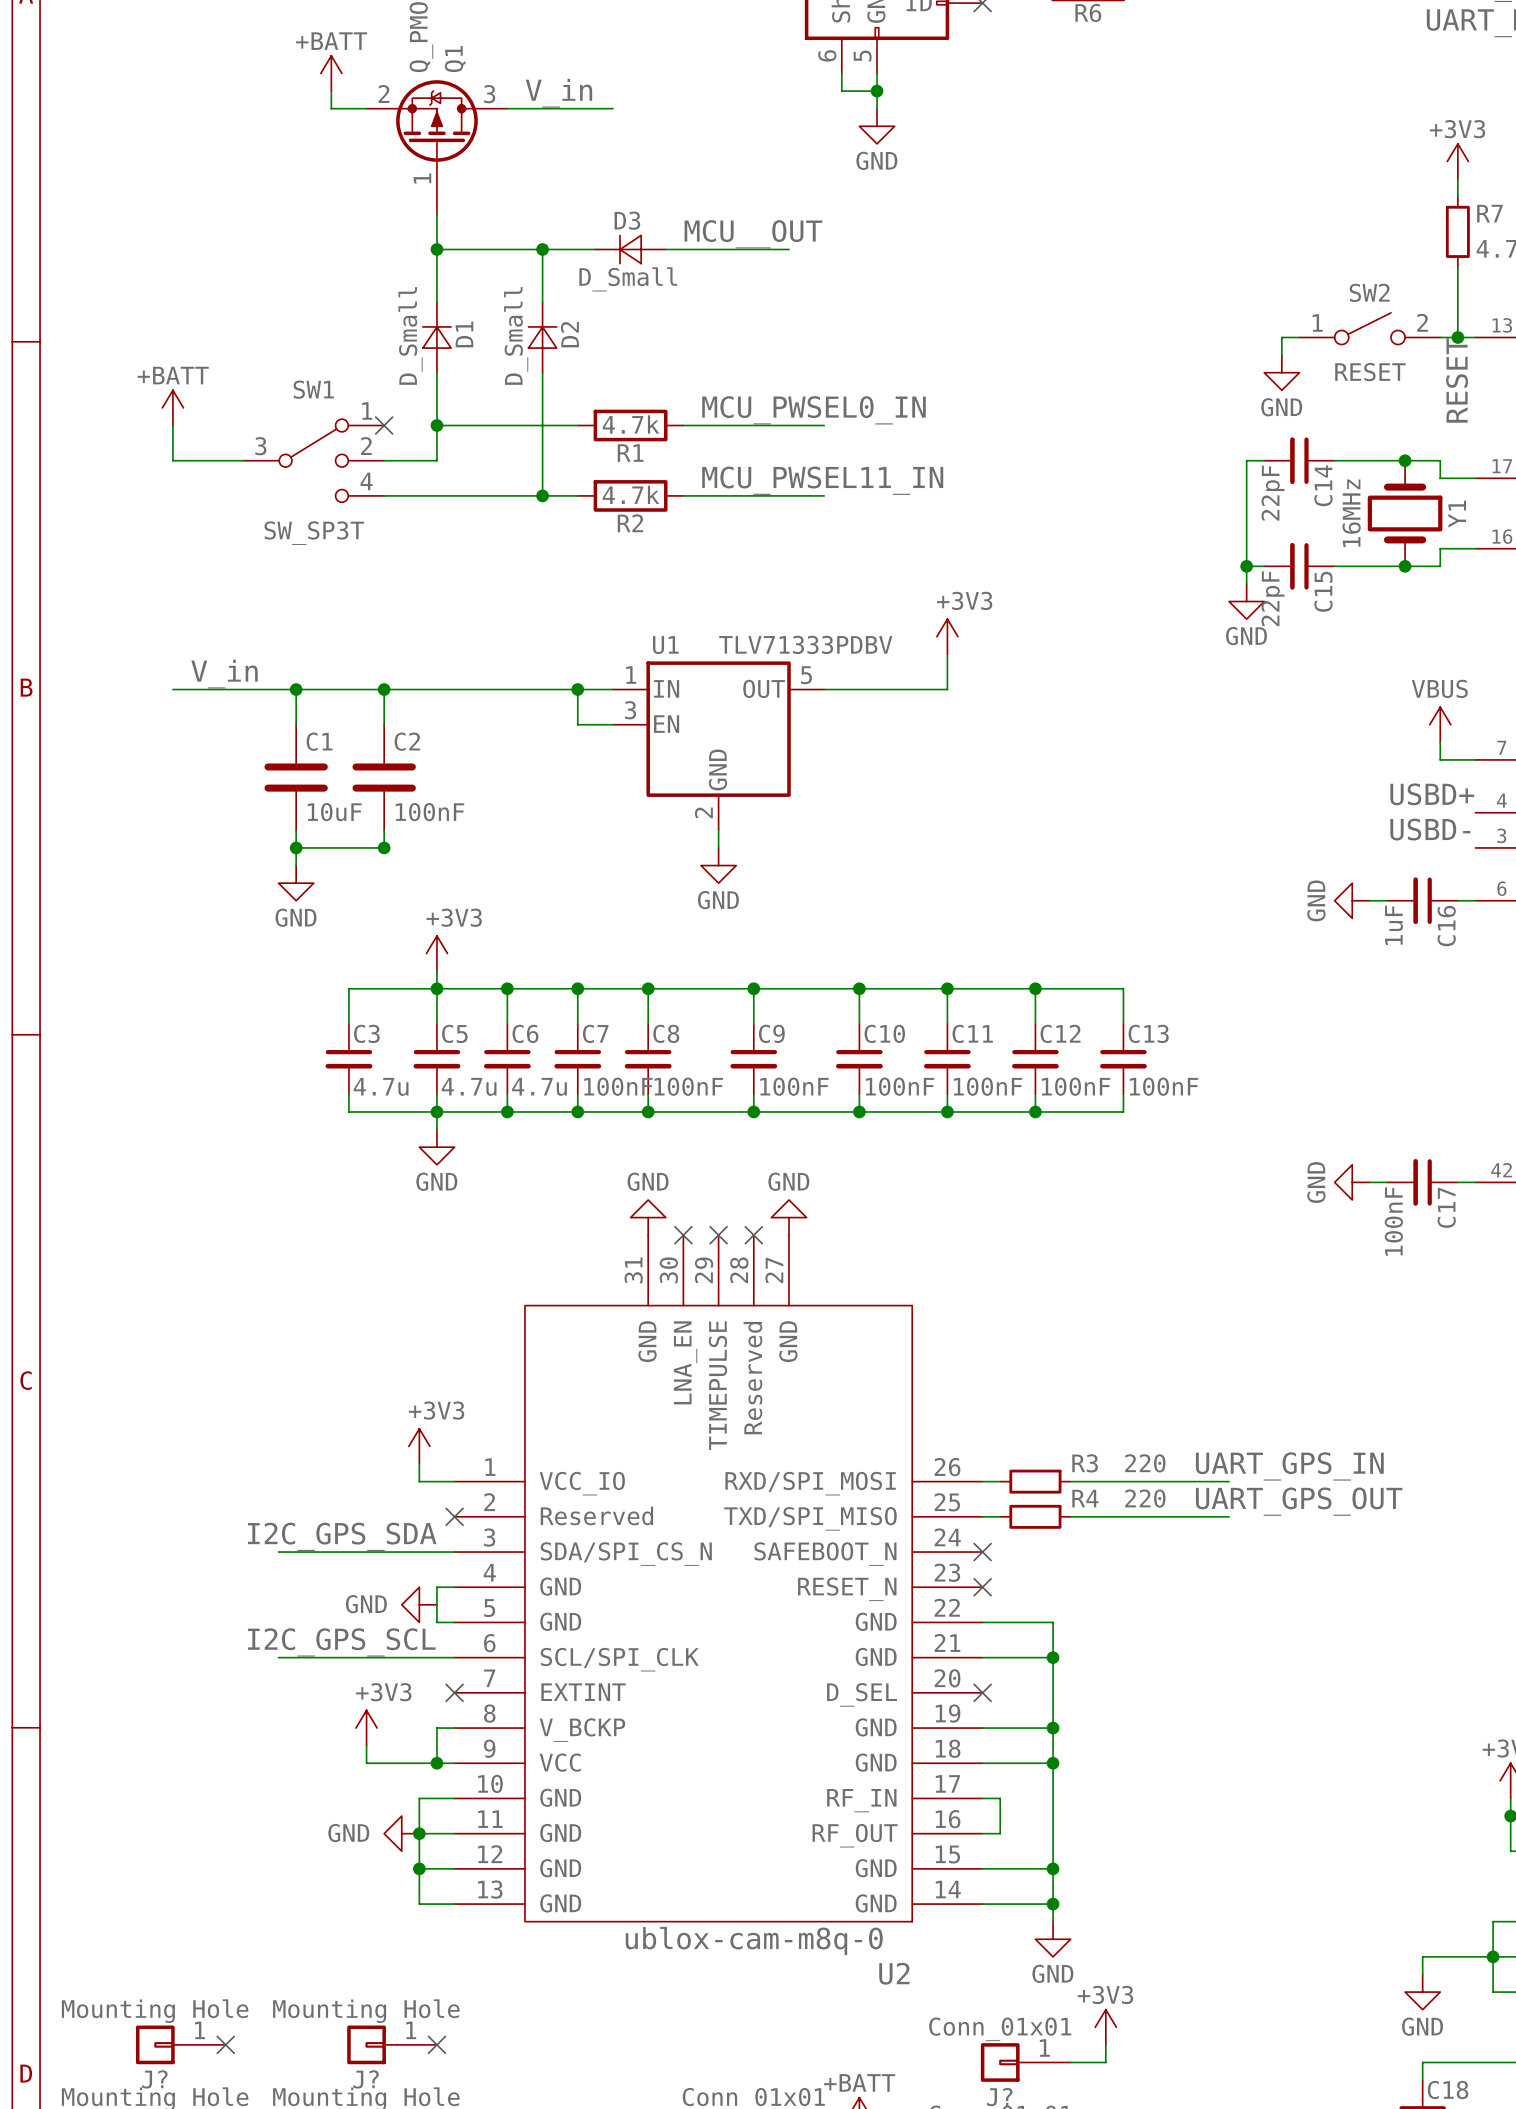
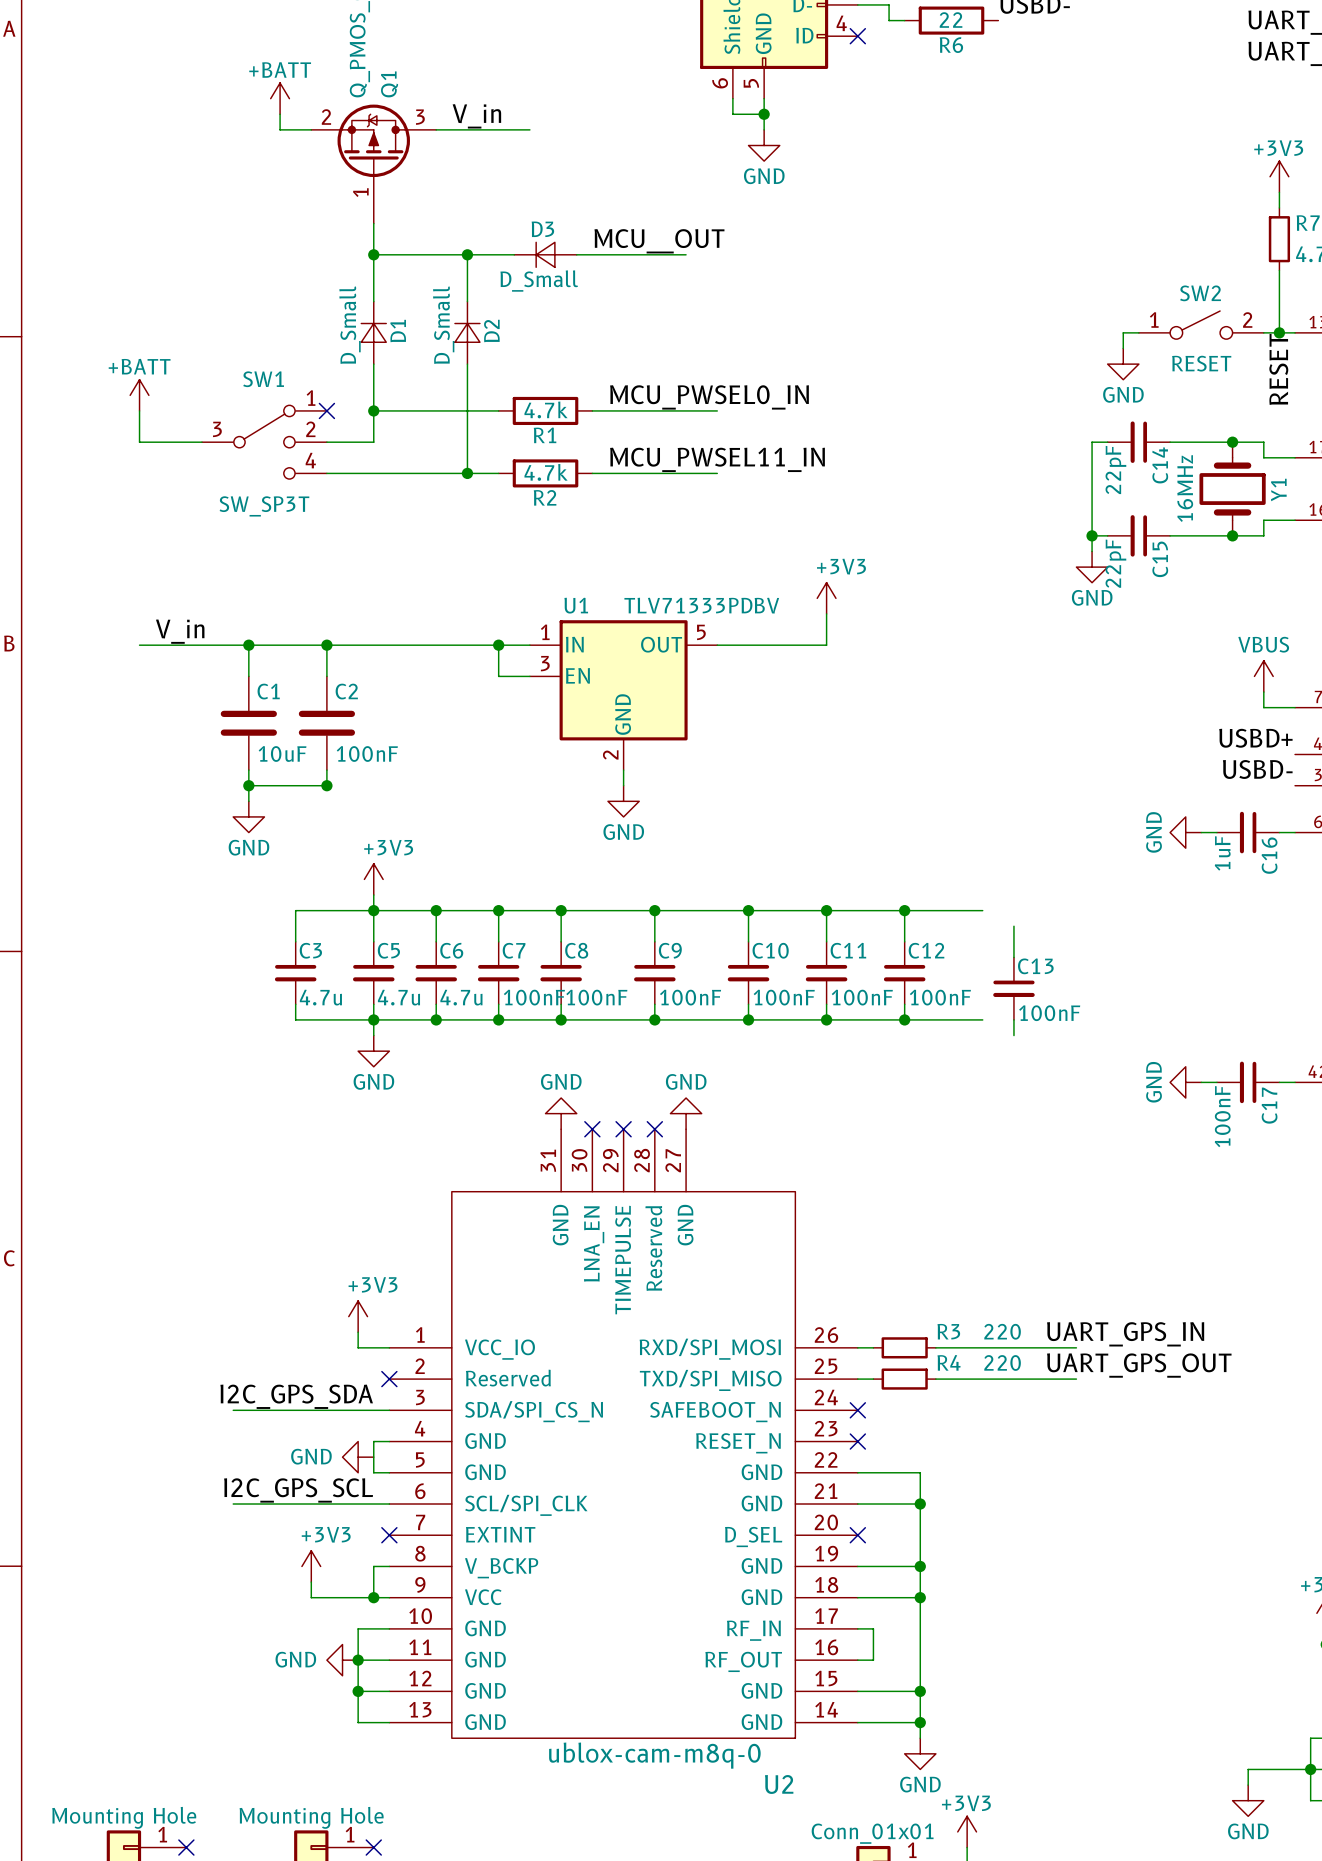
wire: (1123, 988) (1123, 1023) -> (1013, 926) (1013, 957)
C13 position: (1123, 1059) -> (1013, 988)
wire: (1123, 1094) (1123, 1111) -> (1013, 1019) (1013, 1035)

